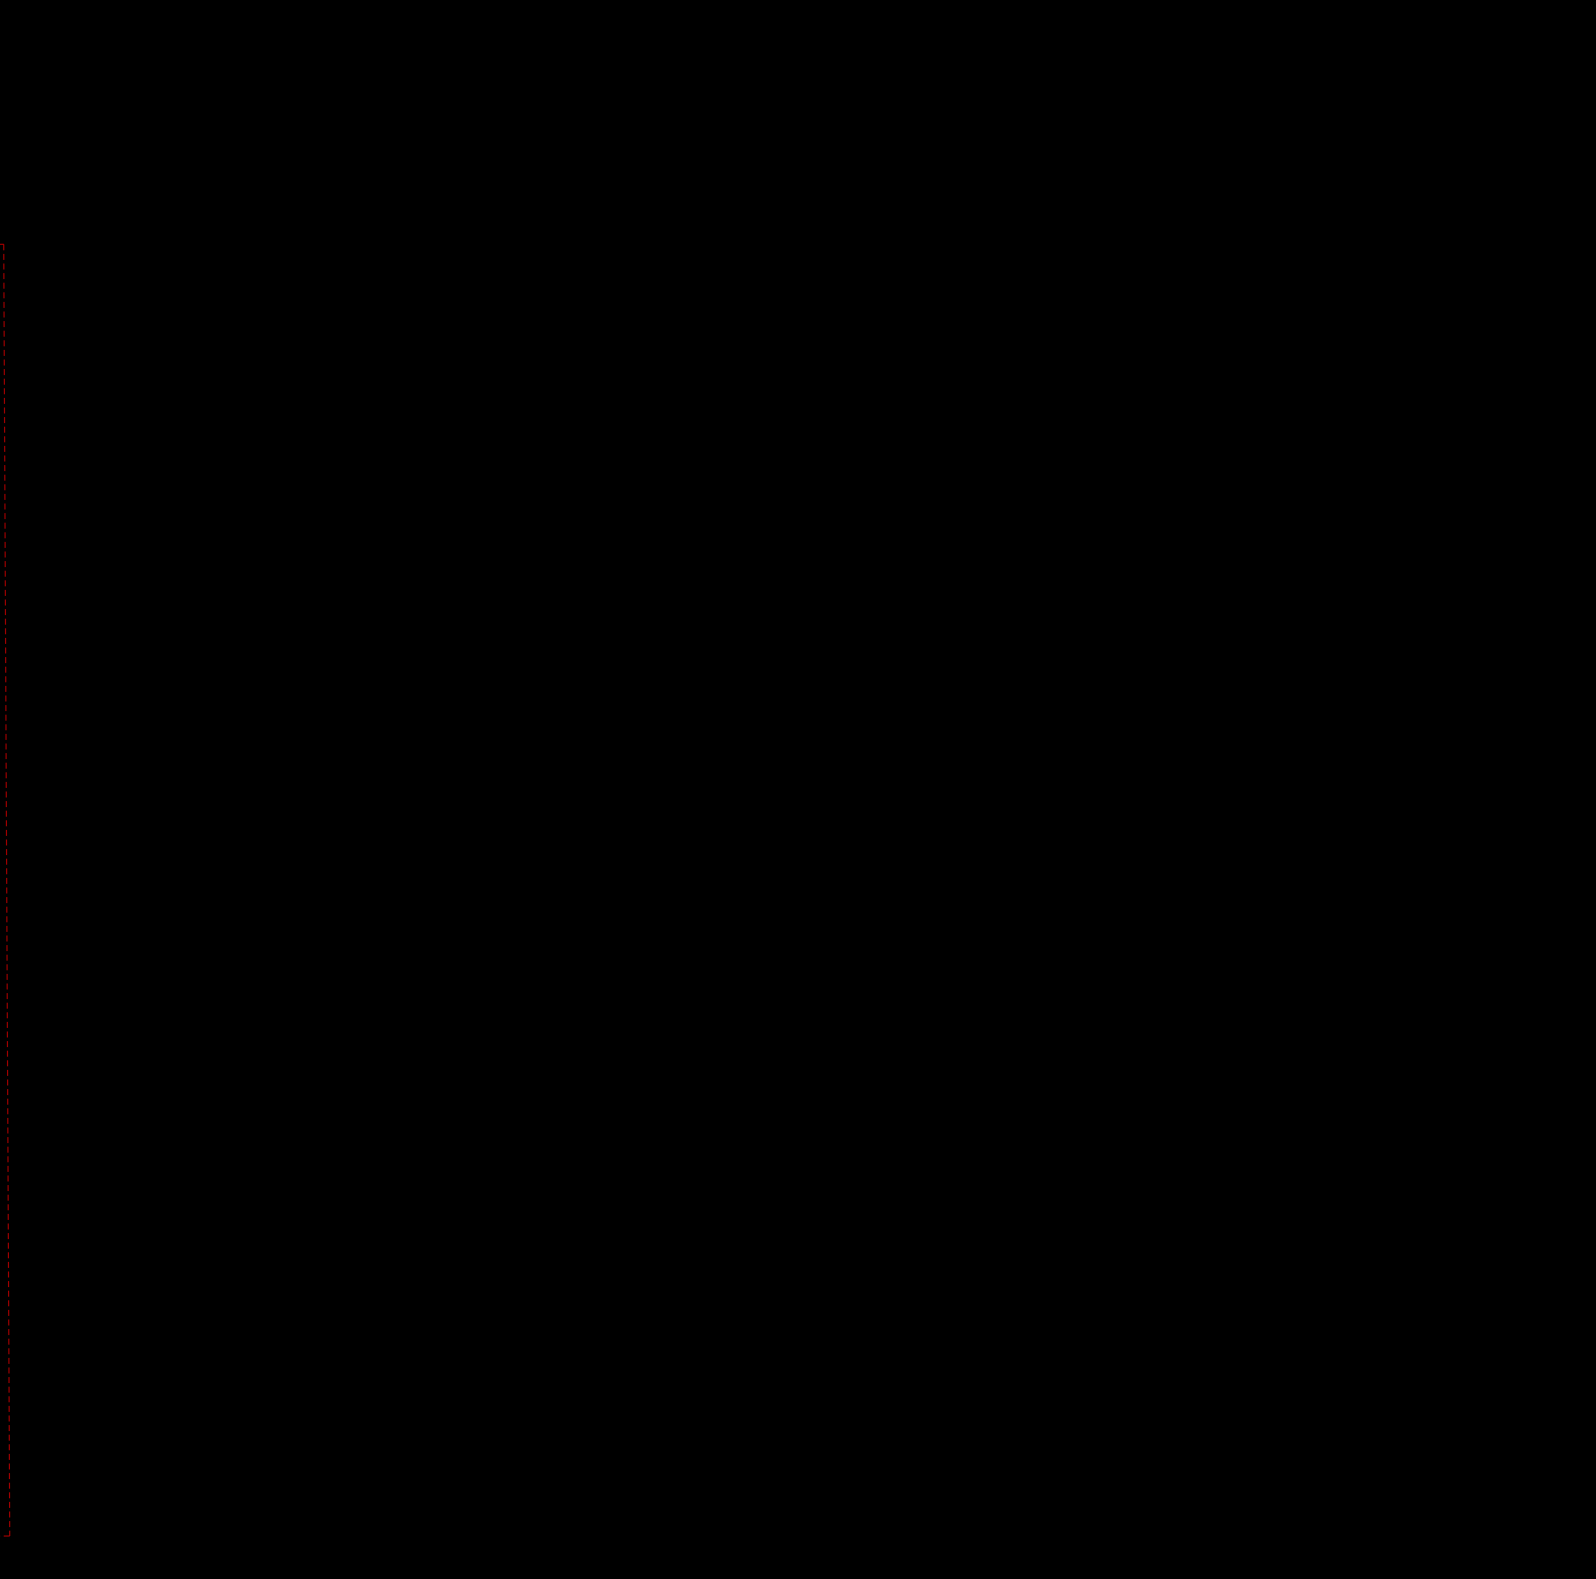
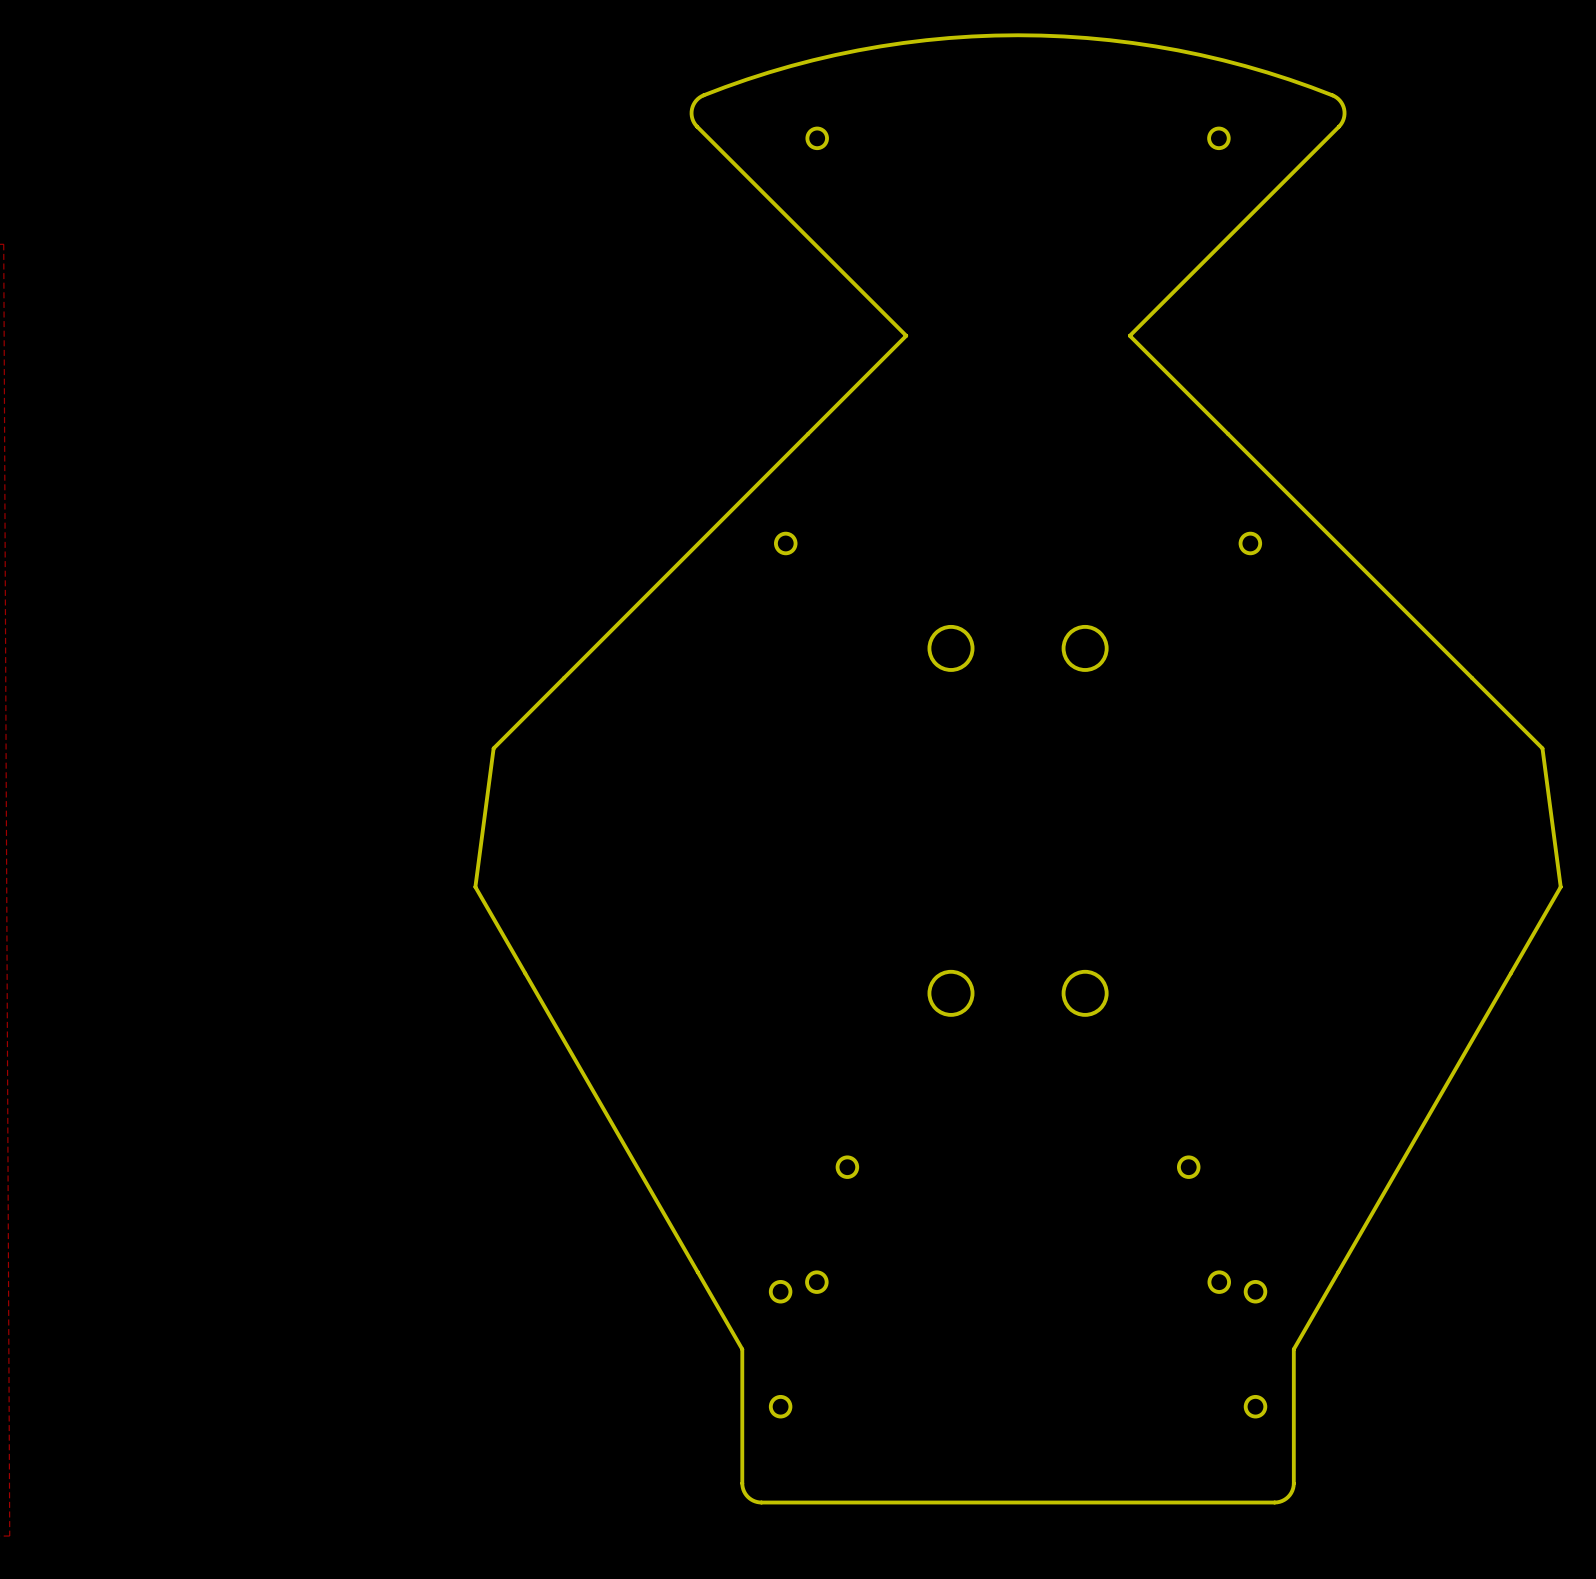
board edge: none -> (703, 95) (696, 100) (691, 109) (692, 118) (695, 124) (906, 335) (493, 748) (475, 887) (742, 1349) (742, 1483) (744, 1491) (749, 1498) (761, 1502) (1281, 1501) (1289, 1495) (1293, 1485) (1293, 1349) (1560, 887) (1542, 748) (1129, 335) (1338, 126) (1344, 116) (1342, 104) (1334, 96) (1289, 79) (1200, 55) (1109, 40) (1041, 35) (949, 38) (858, 50) (790, 66) (703, 95)
round board edge: none -> [805, 126, 829, 151]
round board edge: none -> [1207, 126, 1231, 151]
round board edge: none -> [774, 531, 798, 556]
round board edge: none -> [1238, 531, 1263, 556]
round board edge: none -> [927, 624, 975, 672]
round board edge: none -> [1061, 624, 1109, 672]
round board edge: none -> [927, 969, 975, 1017]
round board edge: none -> [1061, 969, 1109, 1017]
round board edge: none -> [835, 1155, 860, 1179]
round board edge: none -> [1176, 1155, 1201, 1179]
round board edge: none -> [805, 1270, 829, 1294]
round board edge: none -> [1207, 1270, 1231, 1294]
round board edge: none -> [768, 1280, 793, 1304]
round board edge: none -> [1243, 1280, 1268, 1304]
round board edge: none -> [768, 1394, 793, 1419]
round board edge: none -> [1243, 1394, 1268, 1419]

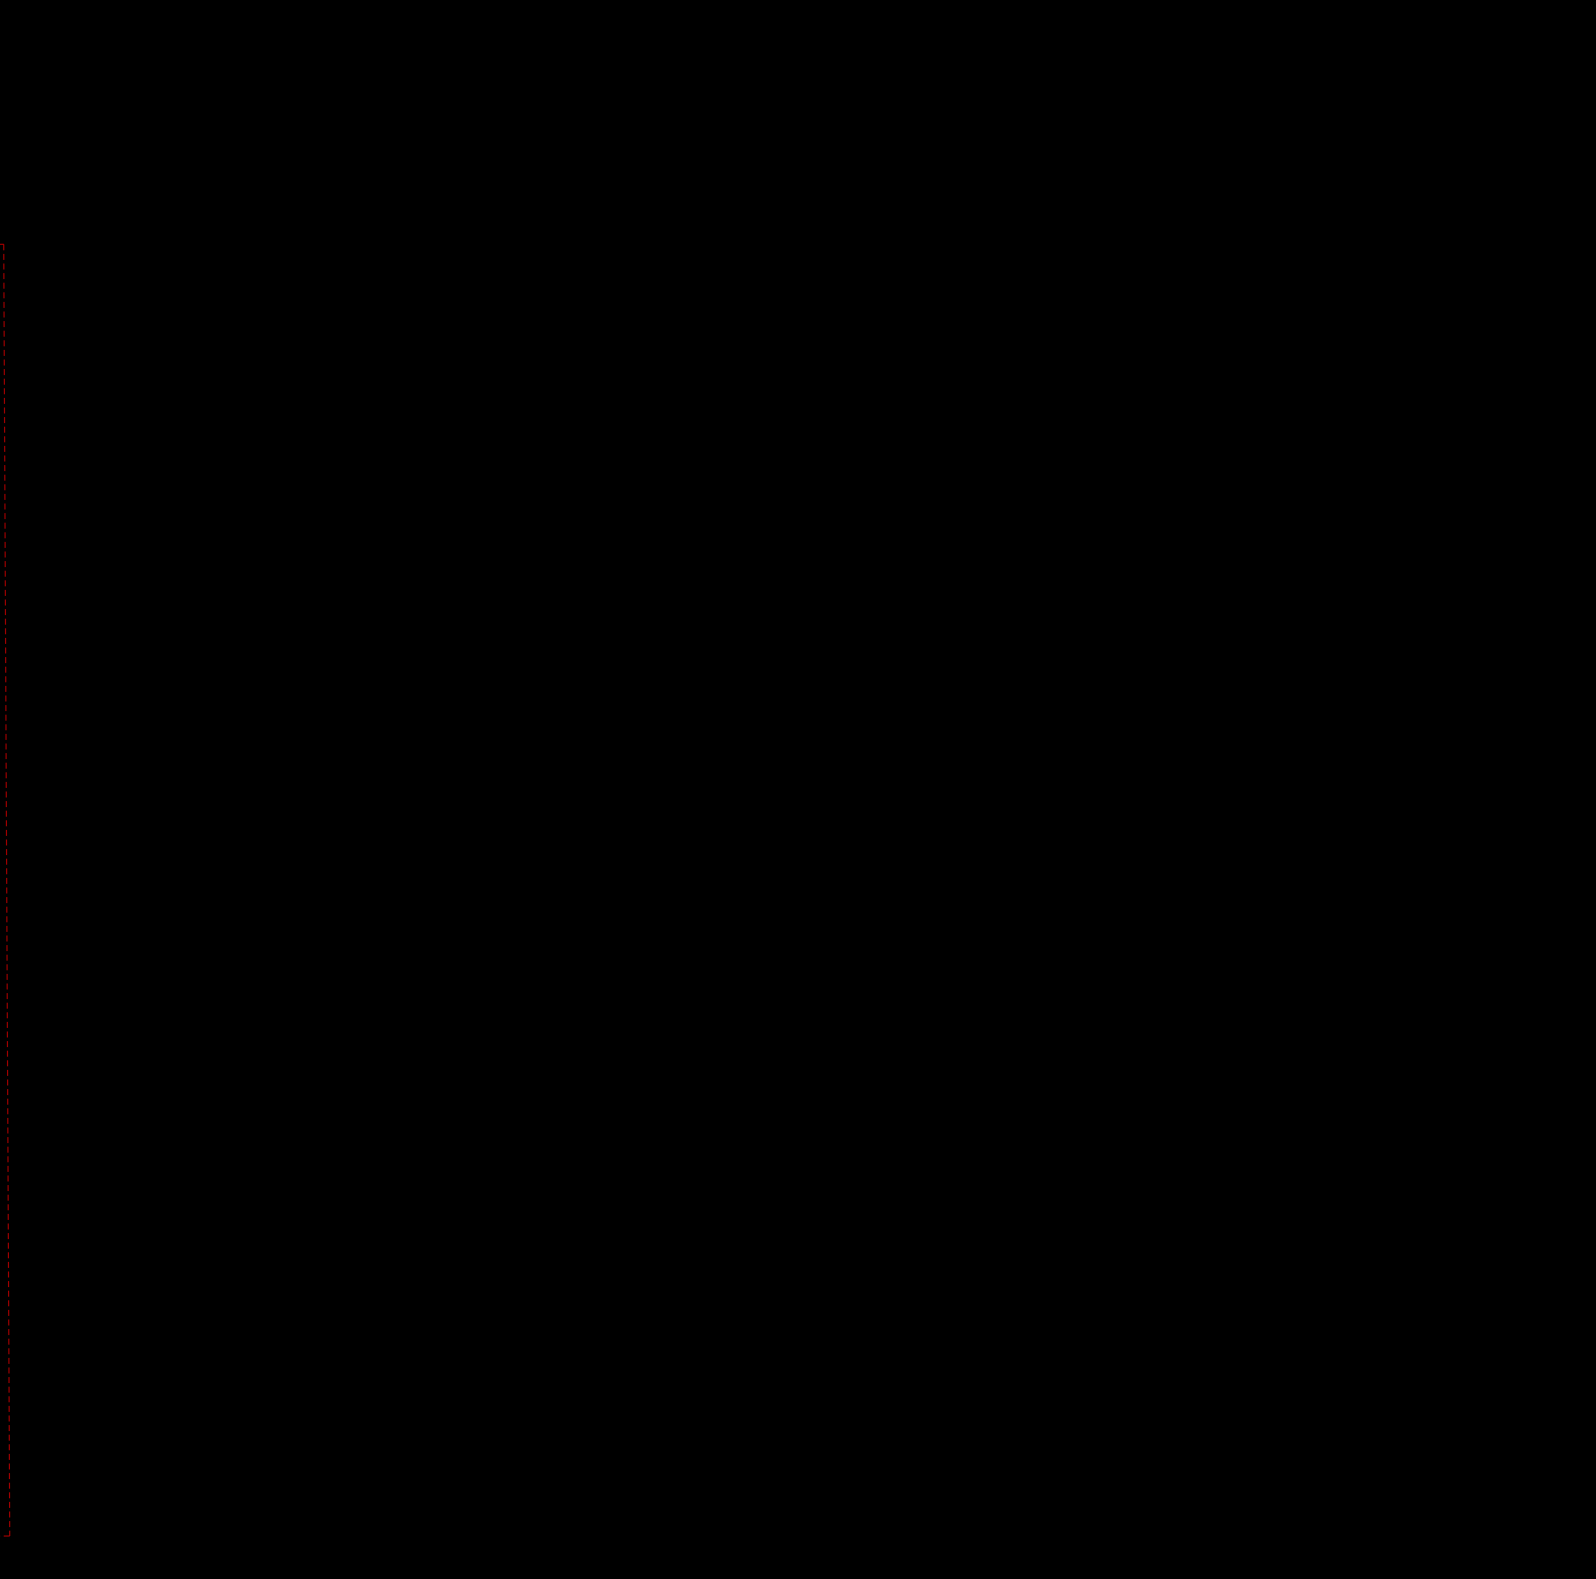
board edge: (703, 95) (696, 100) (691, 109) (692, 118) (695, 124) (906, 335) (493, 748) (475, 887) (742, 1349) (742, 1483) (744, 1491) (749, 1498) (761, 1502) (1281, 1501) (1289, 1495) (1293, 1485) (1293, 1349) (1560, 887) (1542, 748) (1129, 335) (1338, 126) (1344, 116) (1342, 104) (1334, 96) (1289, 79) (1200, 55) (1109, 40) (1041, 35) (949, 38) (858, 50) (790, 66) (703, 95) -> none
round board edge: [805, 126, 829, 151] -> none
round board edge: [1207, 126, 1231, 151] -> none
round board edge: [774, 531, 798, 556] -> none
round board edge: [1238, 531, 1263, 556] -> none
round board edge: [927, 624, 975, 672] -> none
round board edge: [1061, 624, 1109, 672] -> none
round board edge: [927, 969, 975, 1017] -> none
round board edge: [1061, 969, 1109, 1017] -> none
round board edge: [835, 1155, 860, 1179] -> none
round board edge: [1176, 1155, 1201, 1179] -> none
round board edge: [805, 1270, 829, 1294] -> none
round board edge: [1207, 1270, 1231, 1294] -> none
round board edge: [768, 1280, 793, 1304] -> none
round board edge: [1243, 1280, 1268, 1304] -> none
round board edge: [768, 1394, 793, 1419] -> none
round board edge: [1243, 1394, 1268, 1419] -> none

